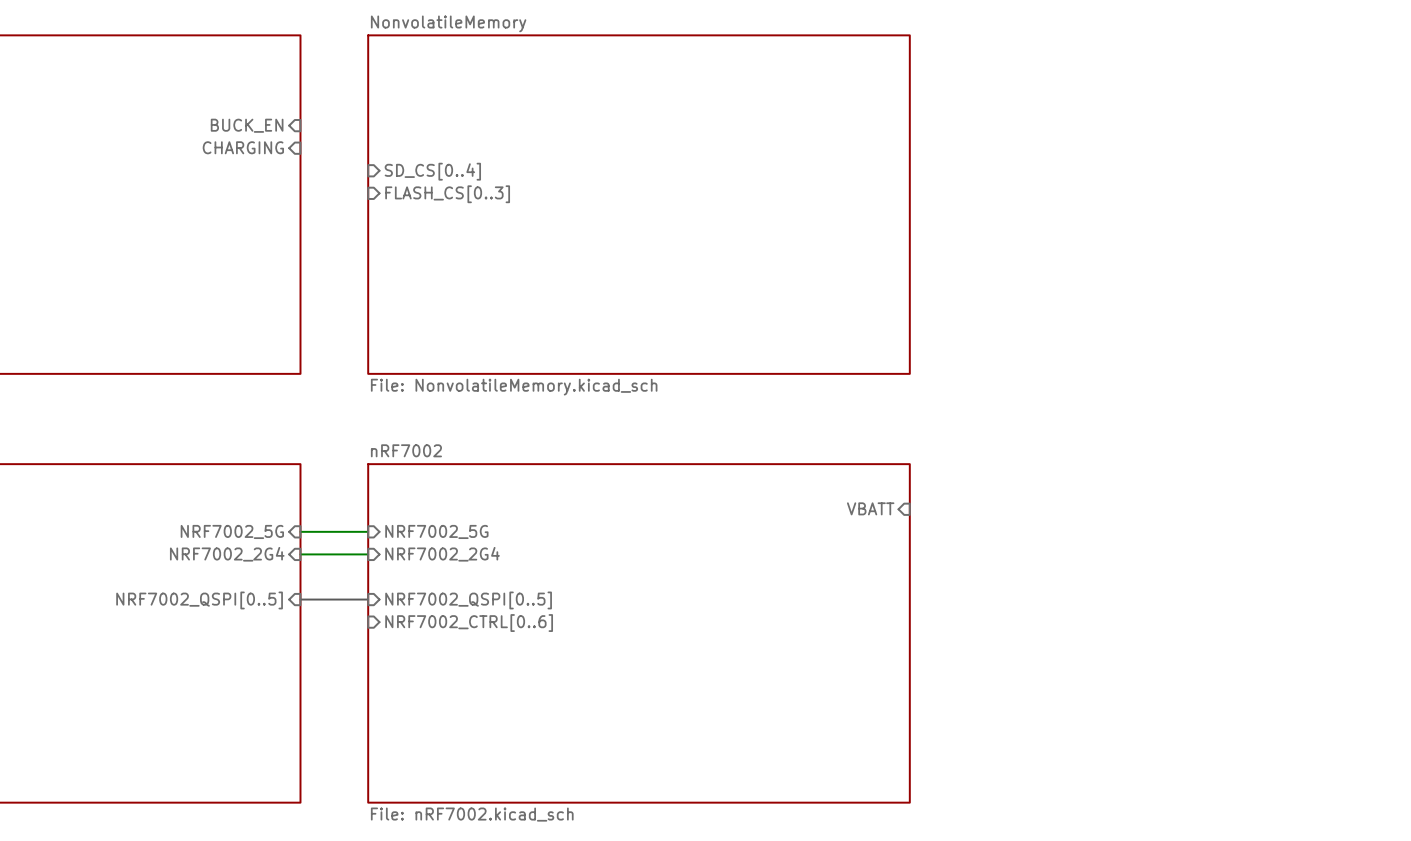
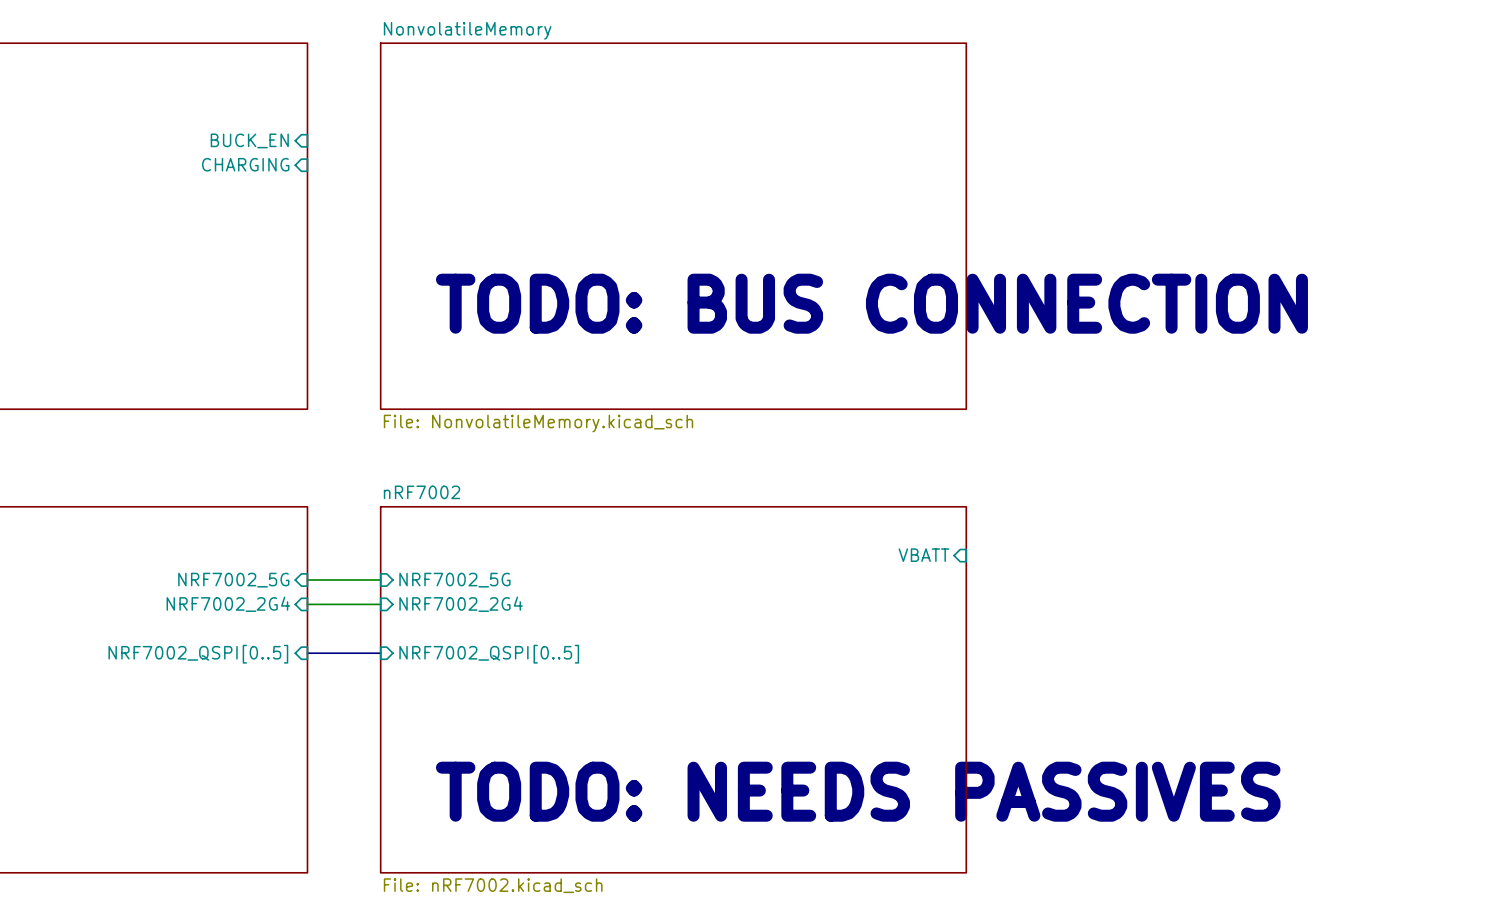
sheet pin: SD_CS[0..4] (432, 171) -> none
sheet pin: FLASH_CS[0..3] (447, 194) -> none
text: none -> TODO: BUS CONNECTION (871, 303)
sheet pin: NRF7002_CTRL[0..6] (469, 623) -> none
text: none -> TODO: NEEDS PASSIVES (858, 791)

